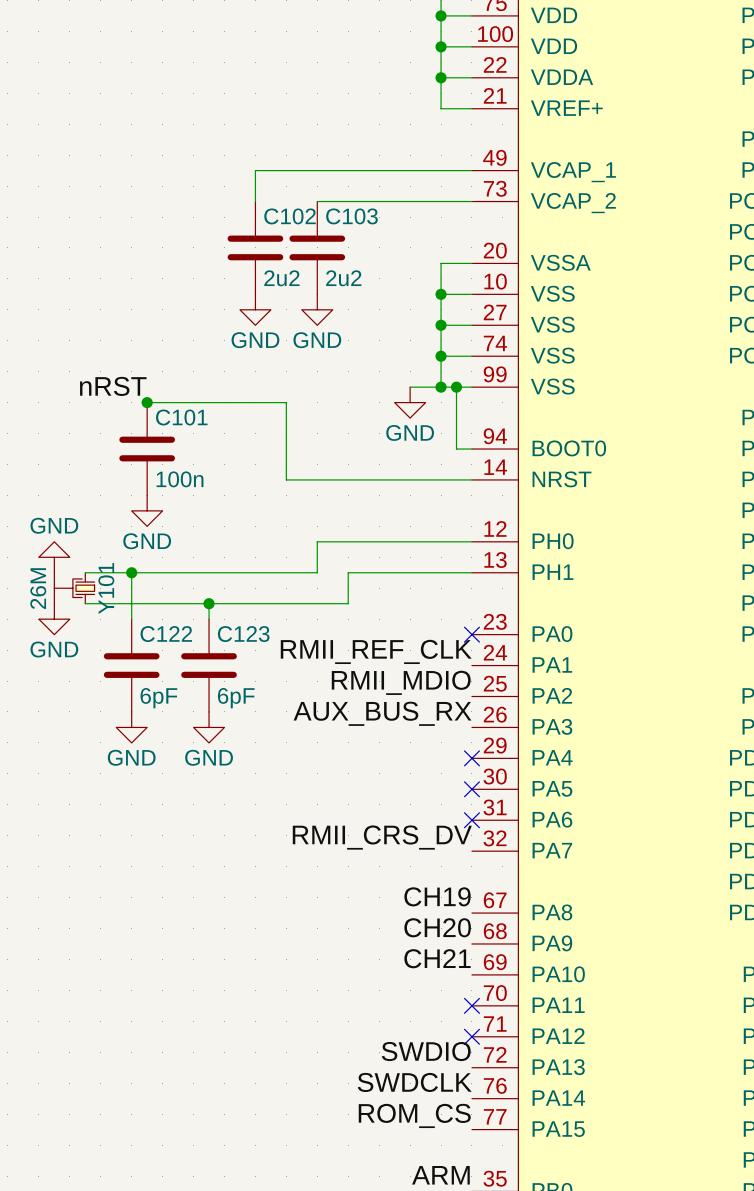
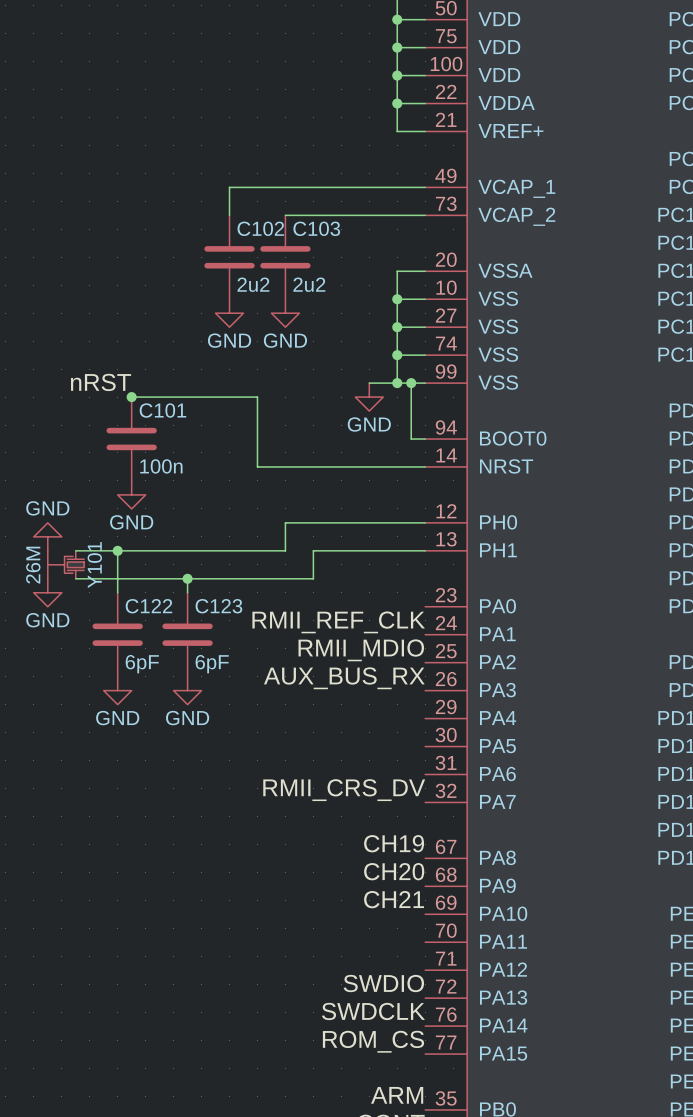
no-connect mark: (471, 634) -> none
no-connect mark: (471, 758) -> none
no-connect mark: (471, 789) -> none
no-connect mark: (471, 820) -> none
no-connect mark: (471, 1005) -> none
no-connect mark: (471, 1036) -> none

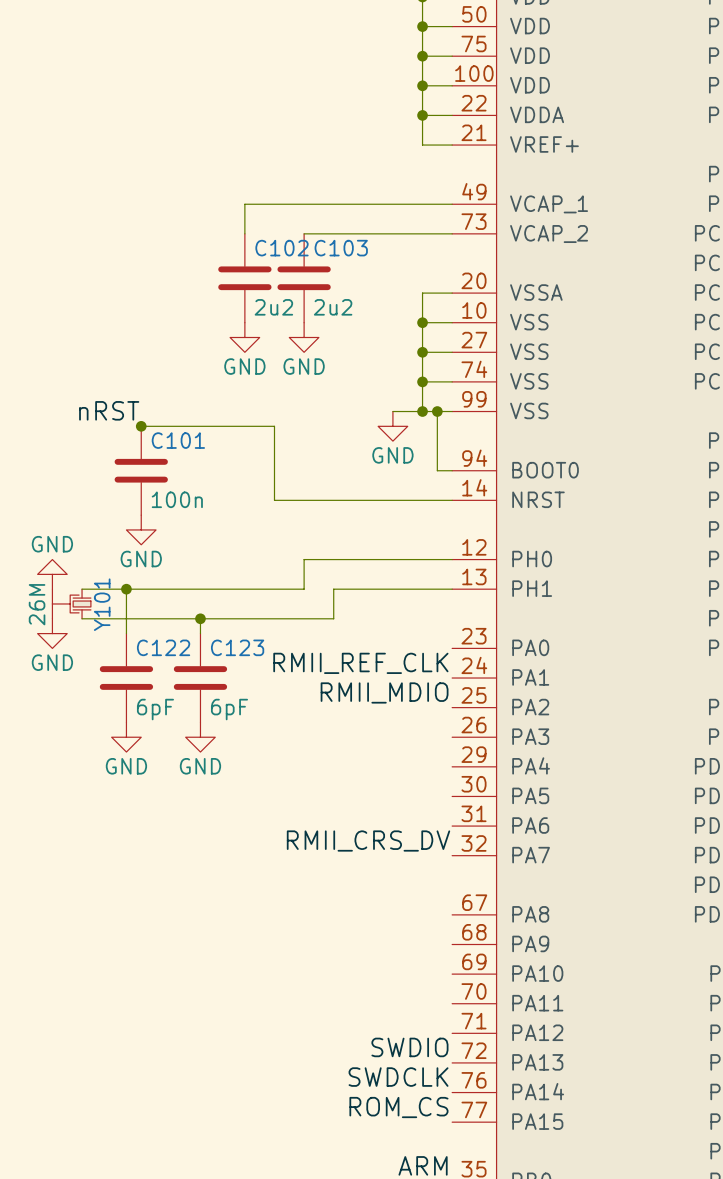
label: AUX_BUS_RX (344, 678) -> none
label: CH19 (394, 843) -> none
label: CH20 (394, 871) -> none
label: CH21 (394, 899) -> none

